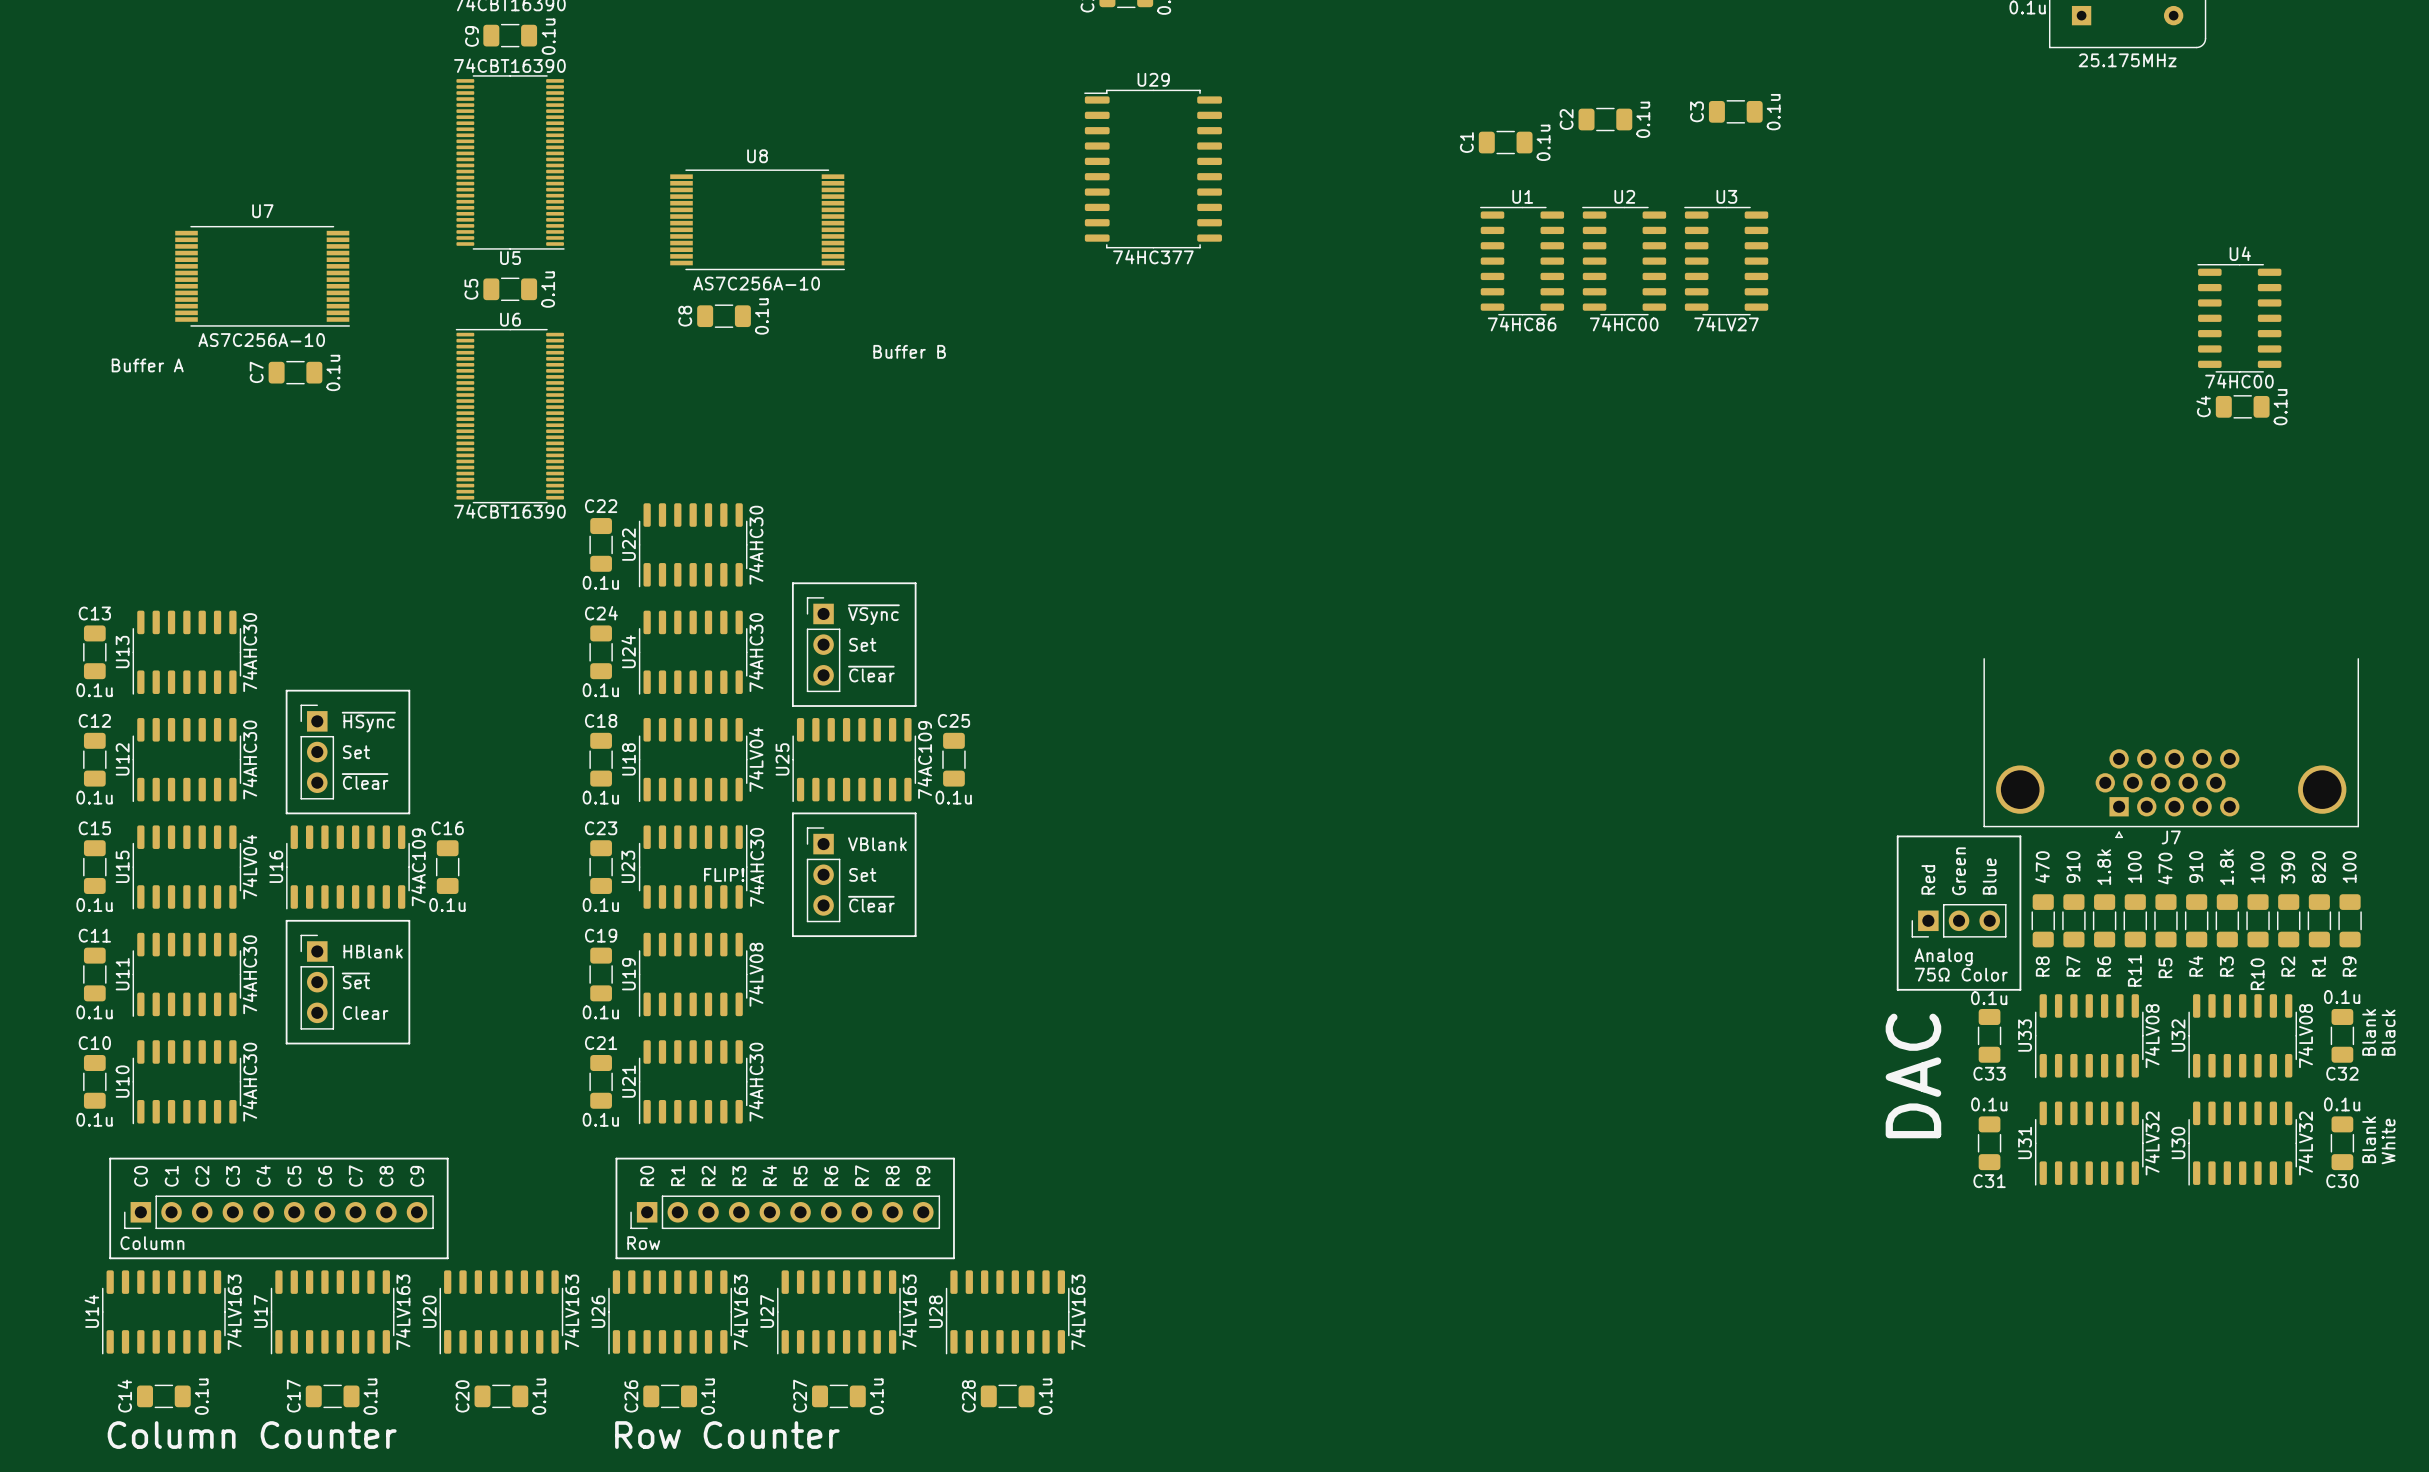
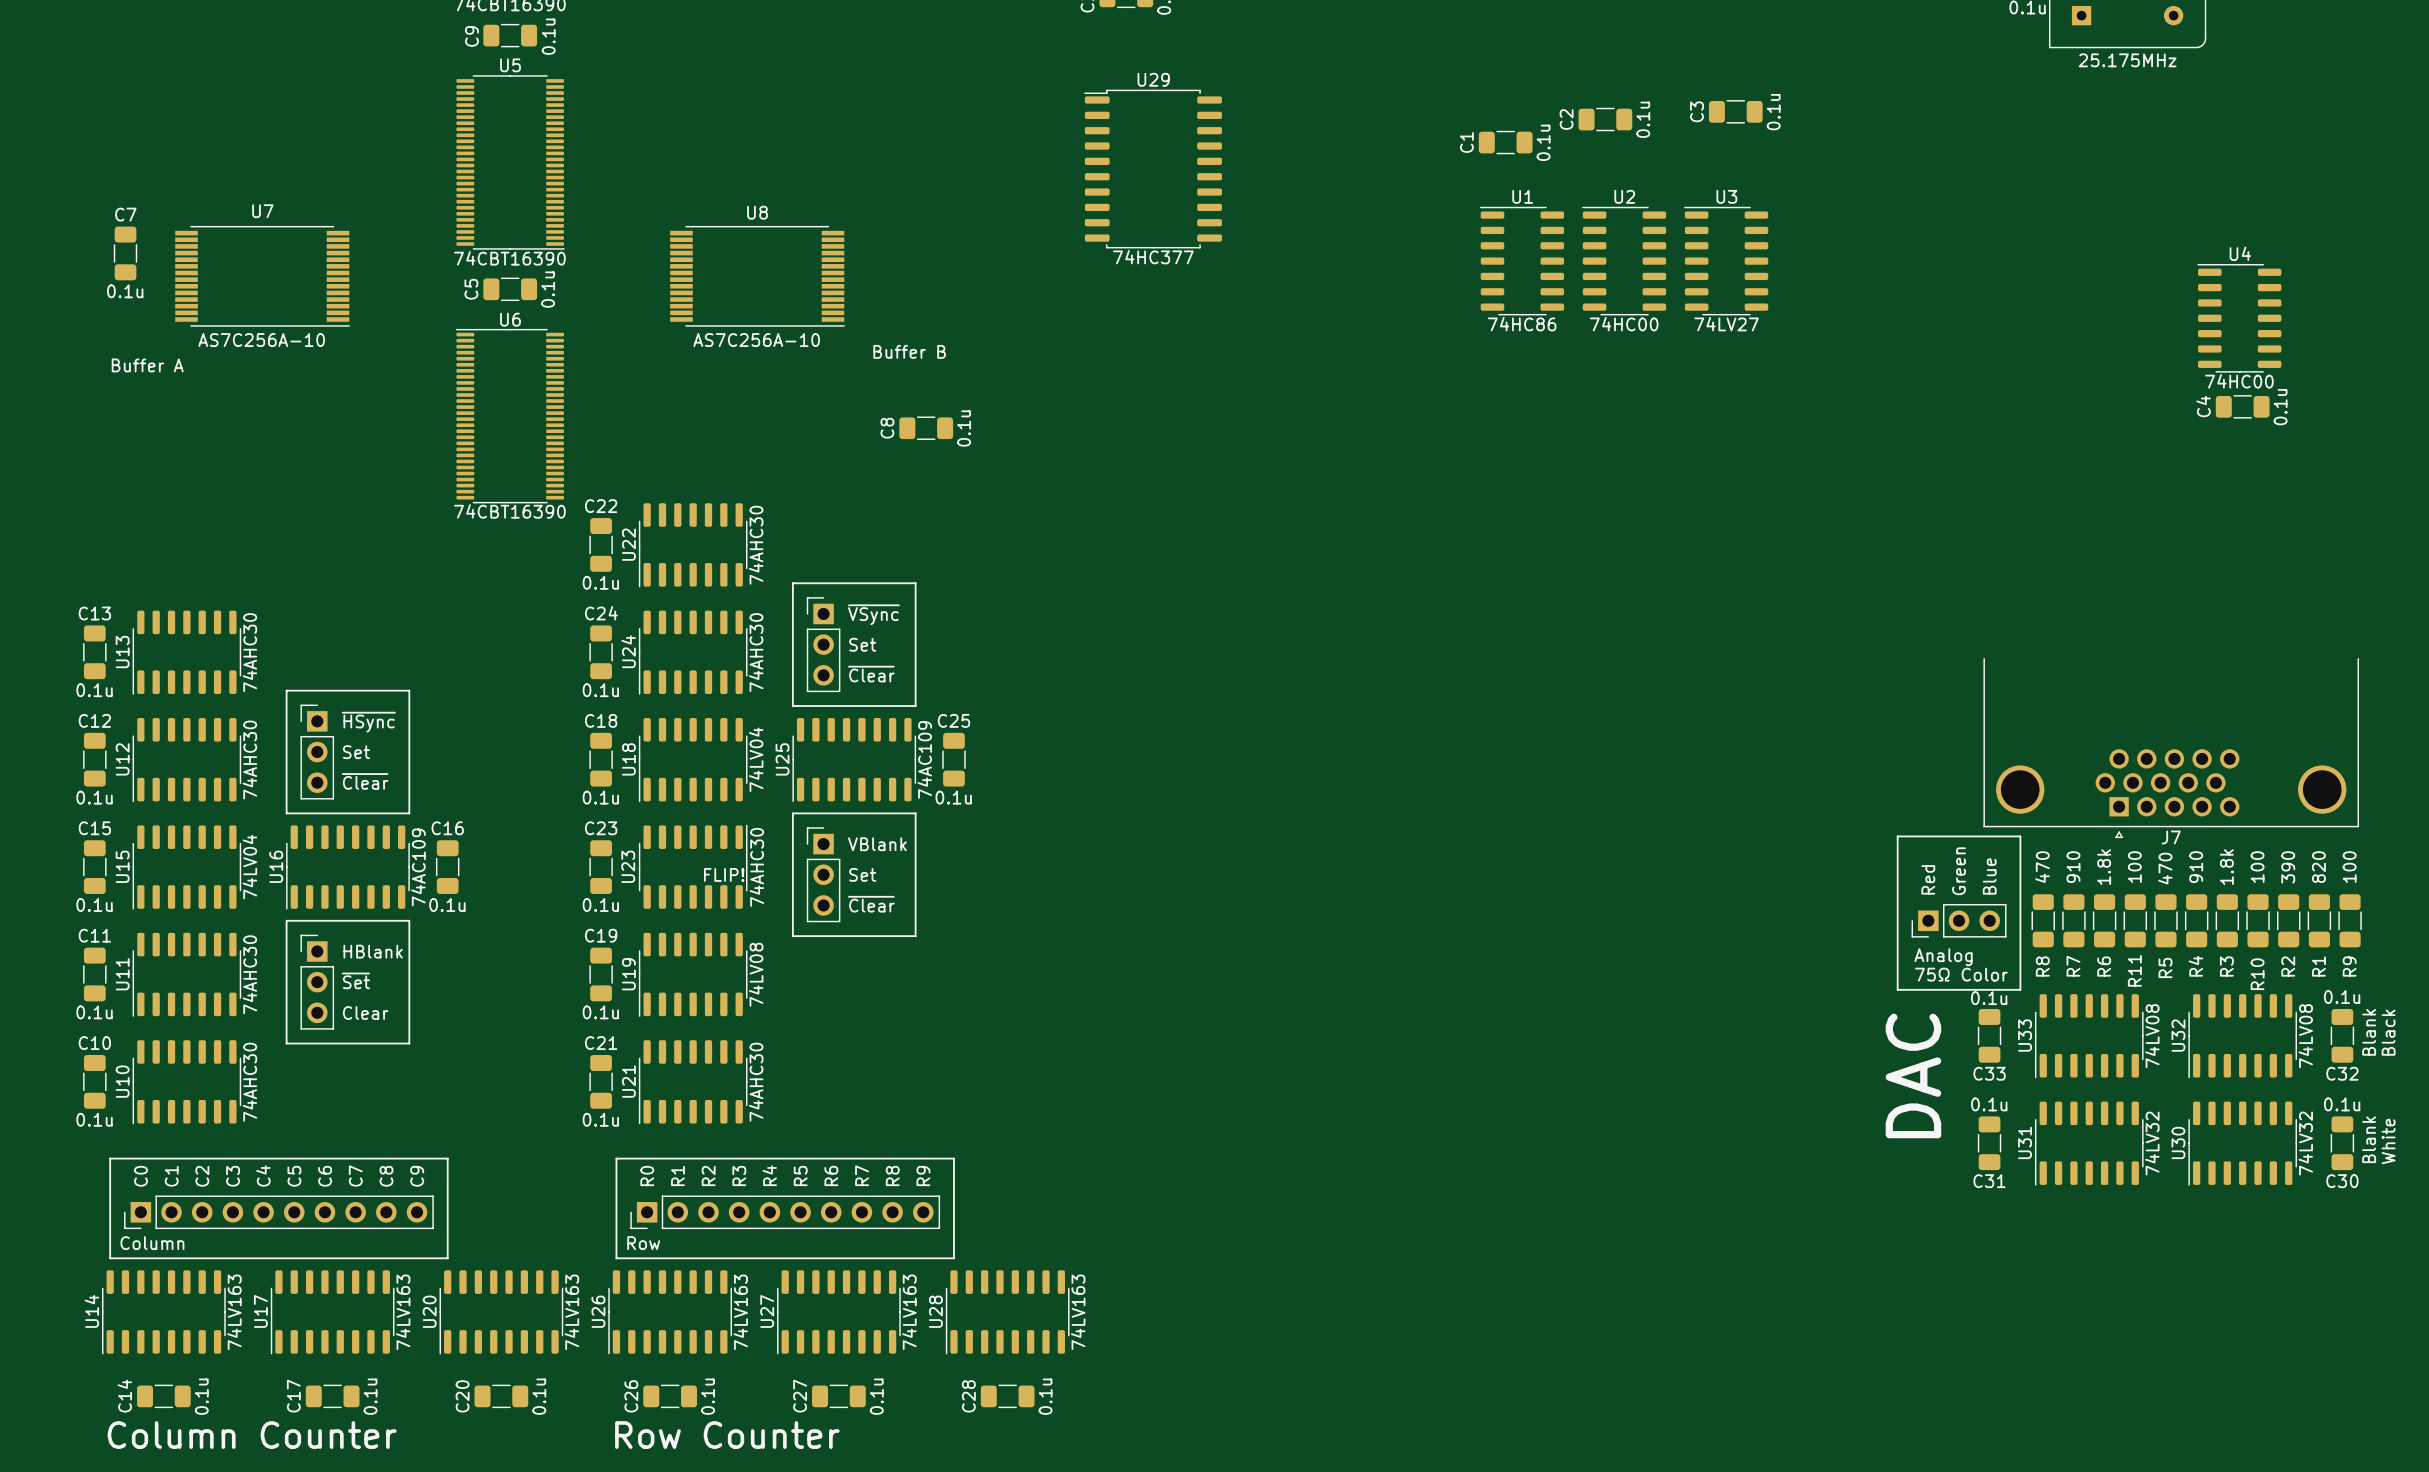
U5 value position: 74CBT16390 (509, 65) -> 74CBT16390 (509, 258)
U8 position: (757, 219) -> (757, 276)
U5 name position: U5 (510, 258) -> U5 (510, 65)
C8 position: (724, 316) -> (926, 428)
C7 rotation: 0° (295, 372) -> 90° clockwise (125, 253)
C7 position: (295, 372) -> (125, 253)

